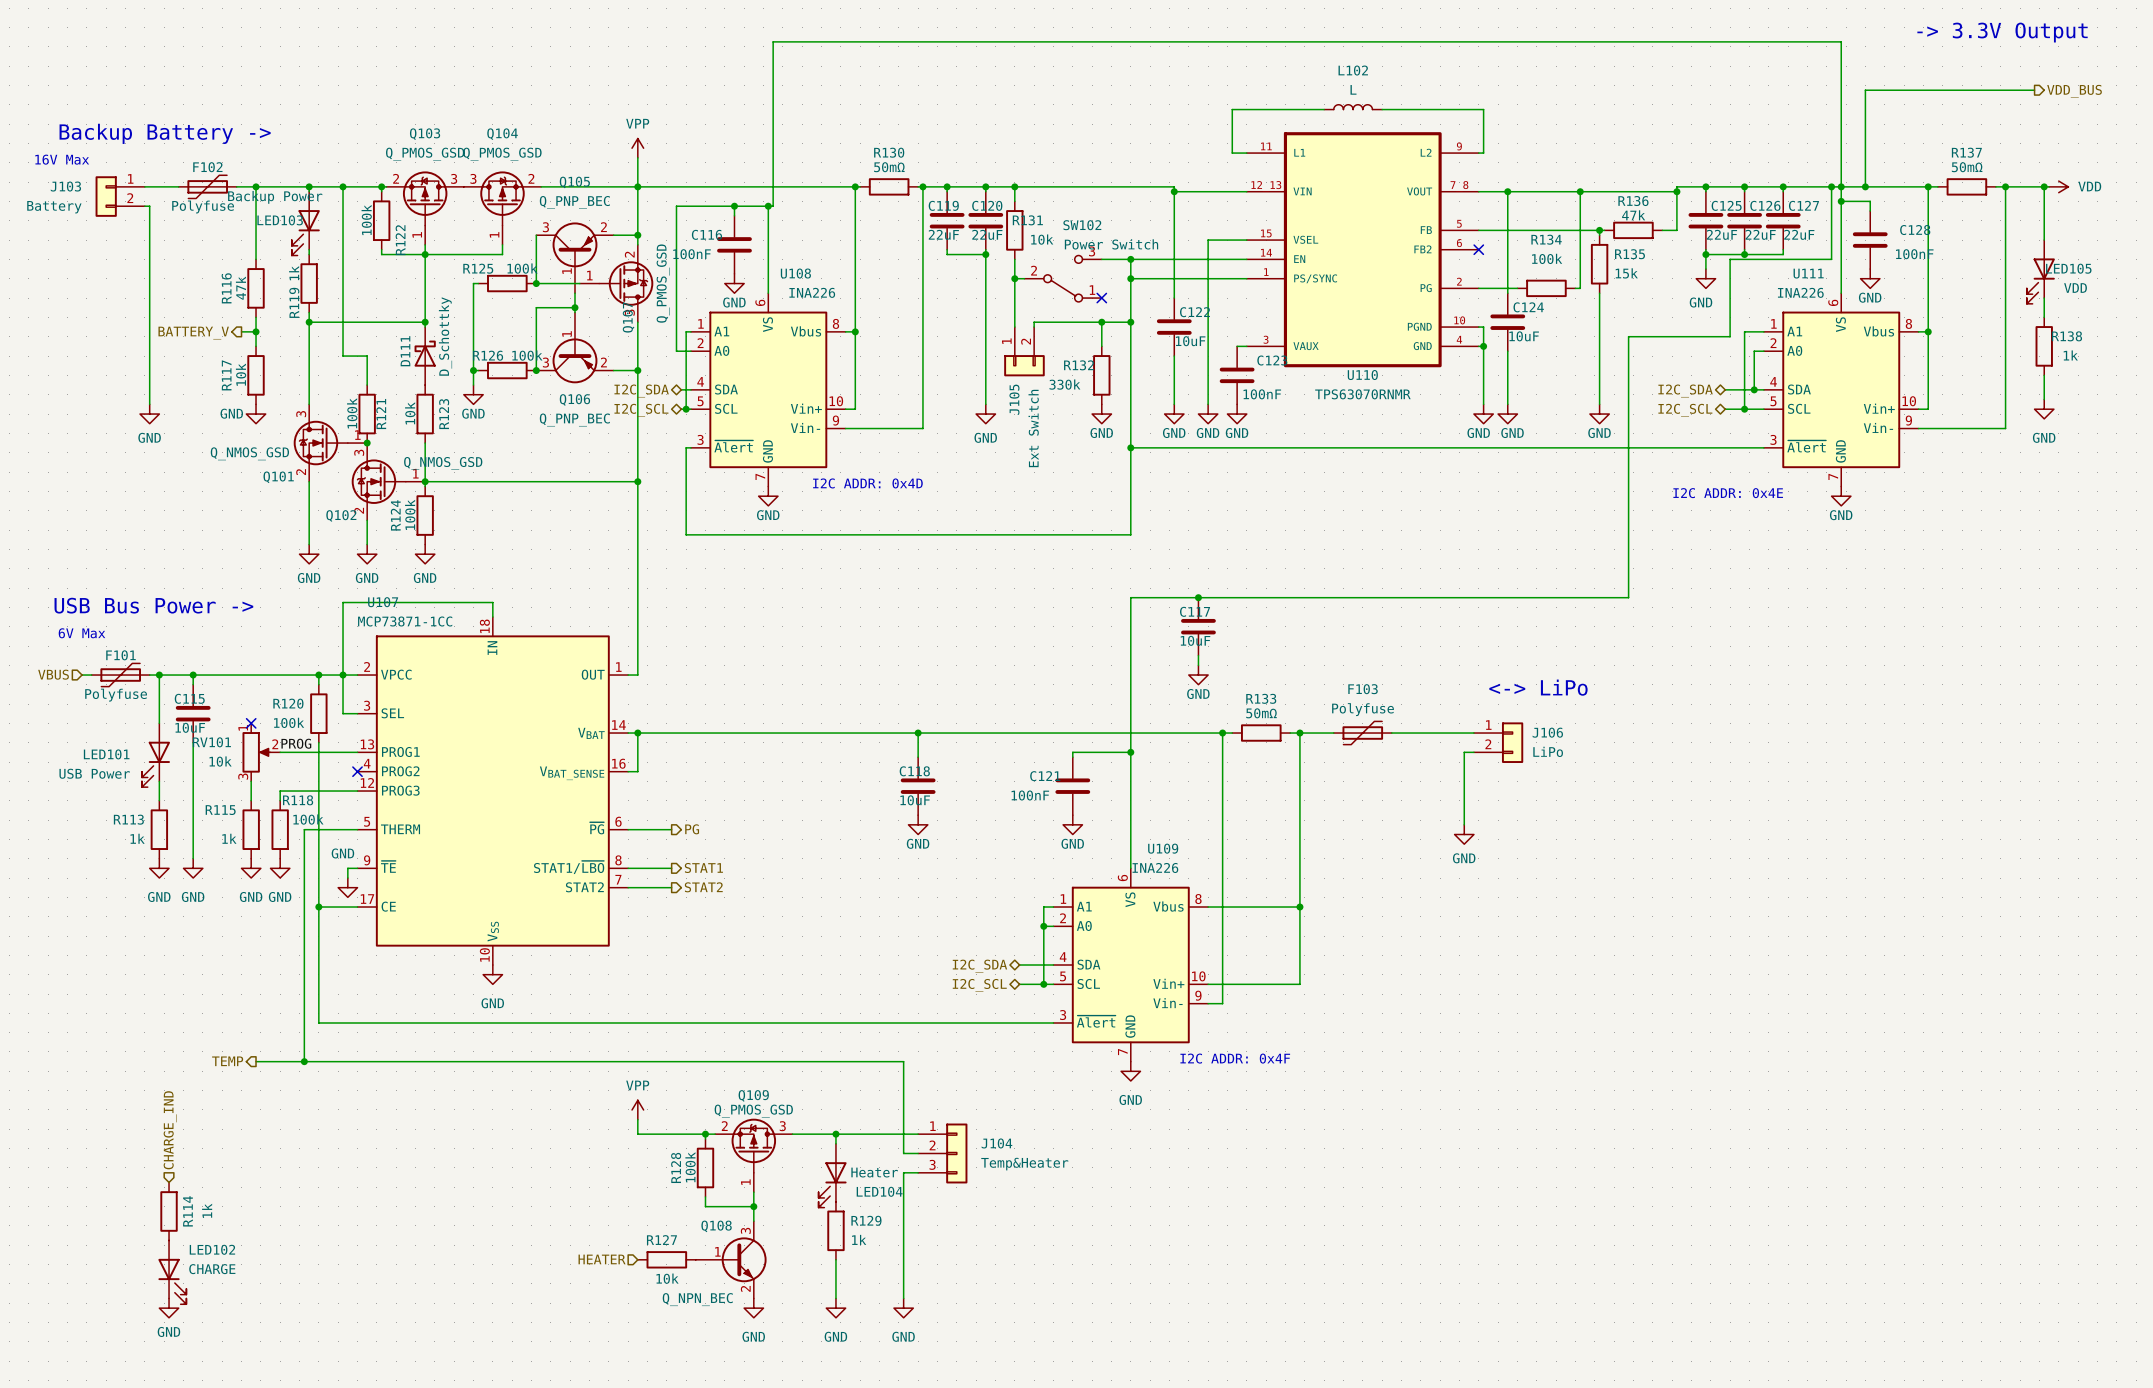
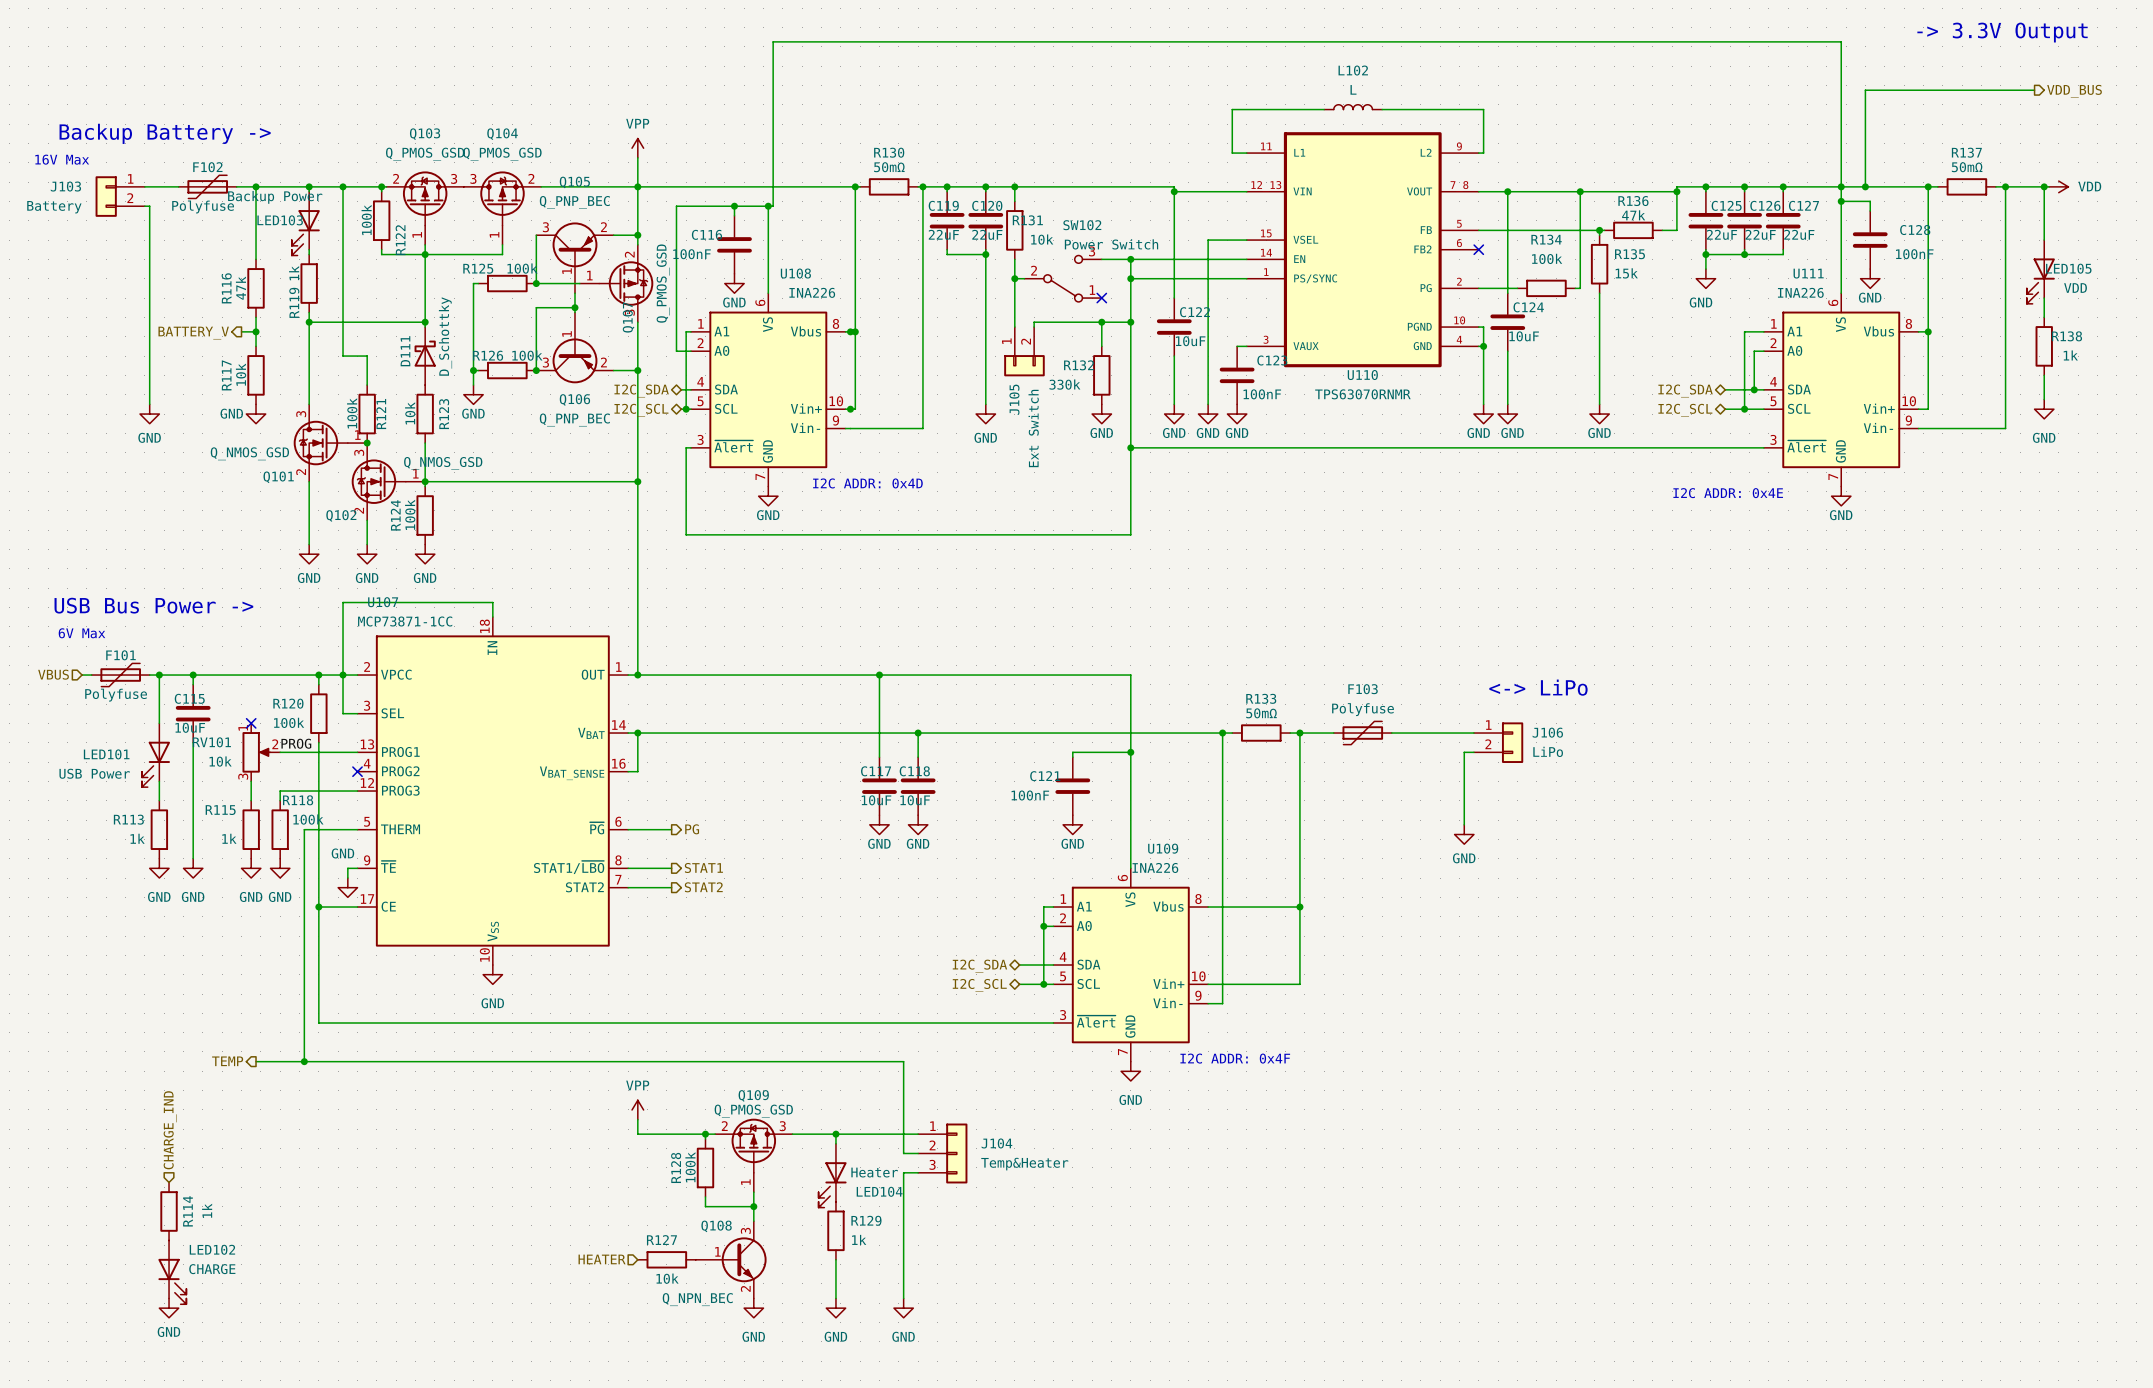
wire: (1831, 186) (1831, 259) (1730, 259) (1730, 336) (1628, 336) (1628, 597) (1130, 597) (1130, 675) -> (637, 675) (1130, 675)
junction: (1831, 186) -> none
junction: none -> (850, 331)
junction: none -> (850, 409)
junction: (1198, 597) -> none
C117 position: (1198, 626) -> (879, 786)
wire: (1198, 655) (1198, 665) -> none
junction: none -> (637, 675)
wire: none -> (879, 675) (879, 757)
junction: none -> (879, 675)
power symbol: GND (1198, 675) -> none
power symbol: none -> GND (879, 824)

